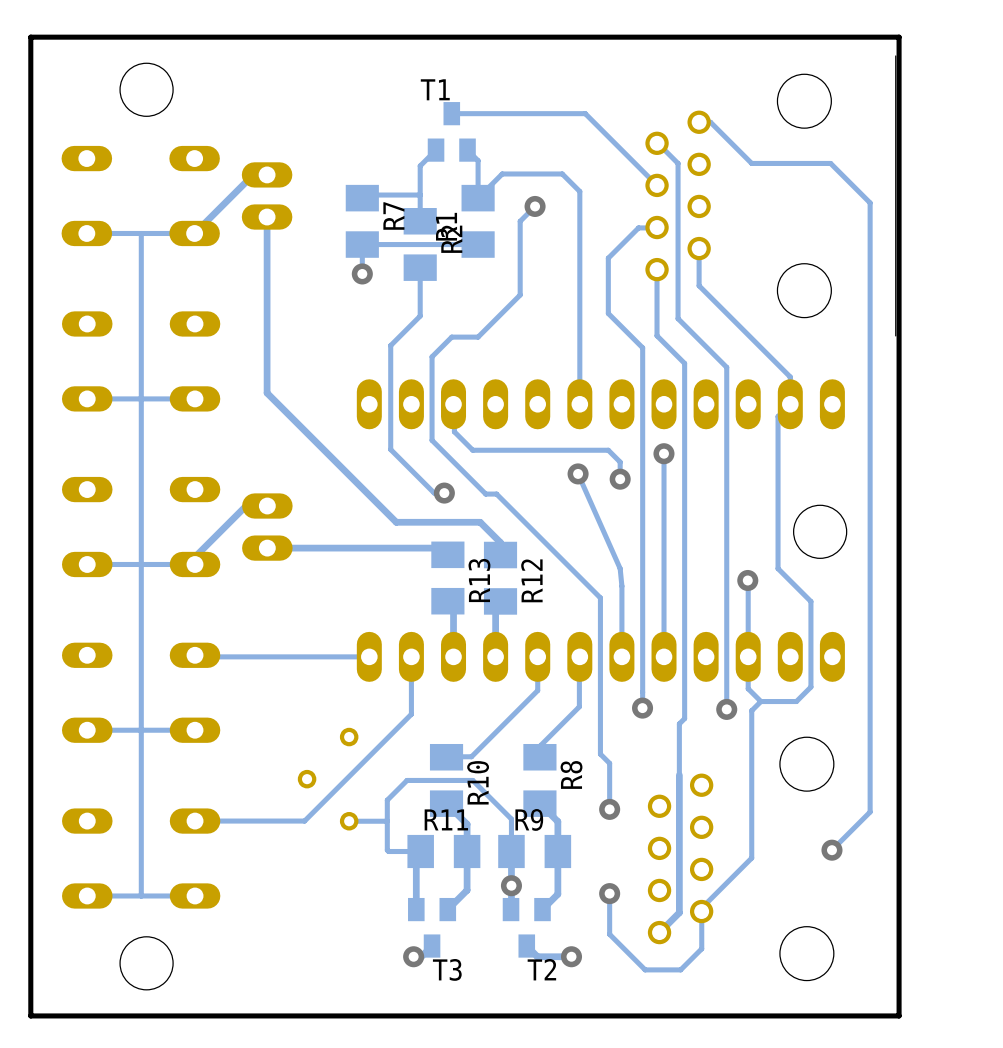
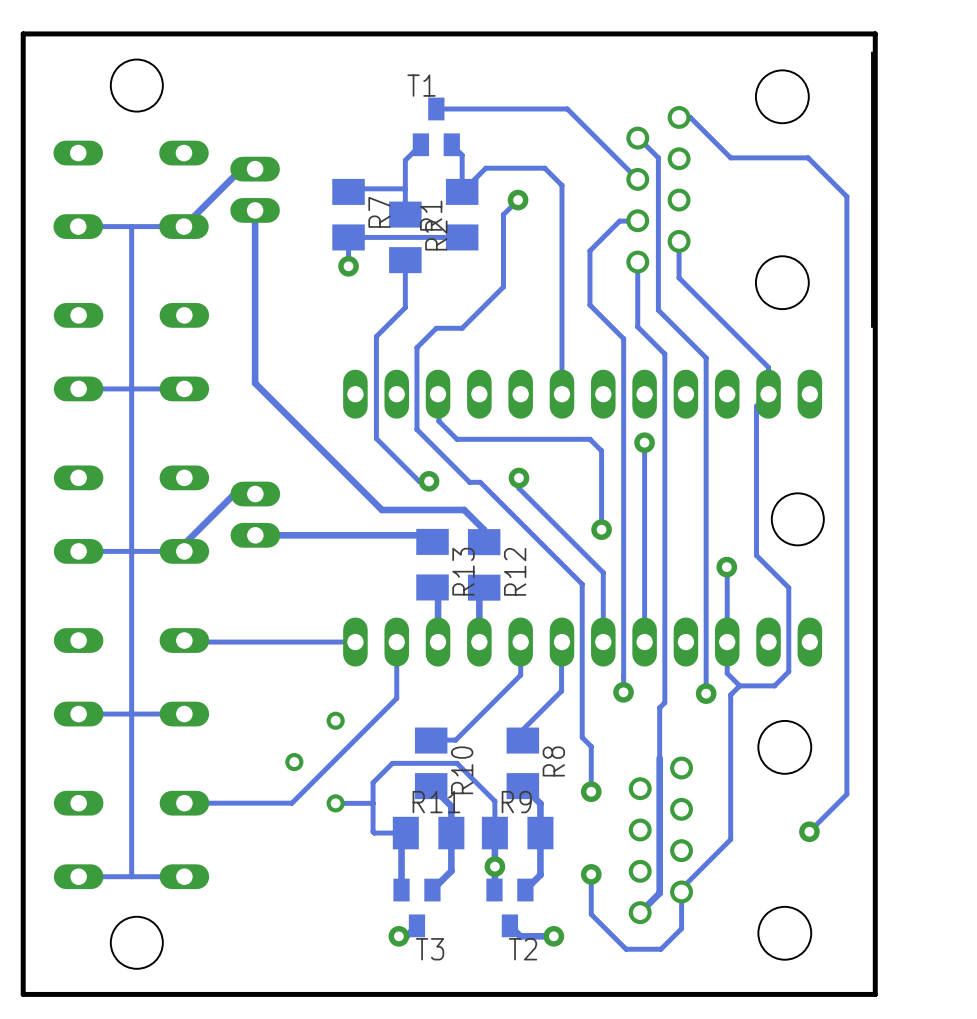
track: (578, 473) (620, 568) (621, 586) -> (518, 478) (518, 488) (603, 572)
via: (578, 473) -> none
track: none -> (601, 467) (601, 529)
via: (620, 479) -> none
via: none -> (518, 478)
via: none -> (601, 529)

